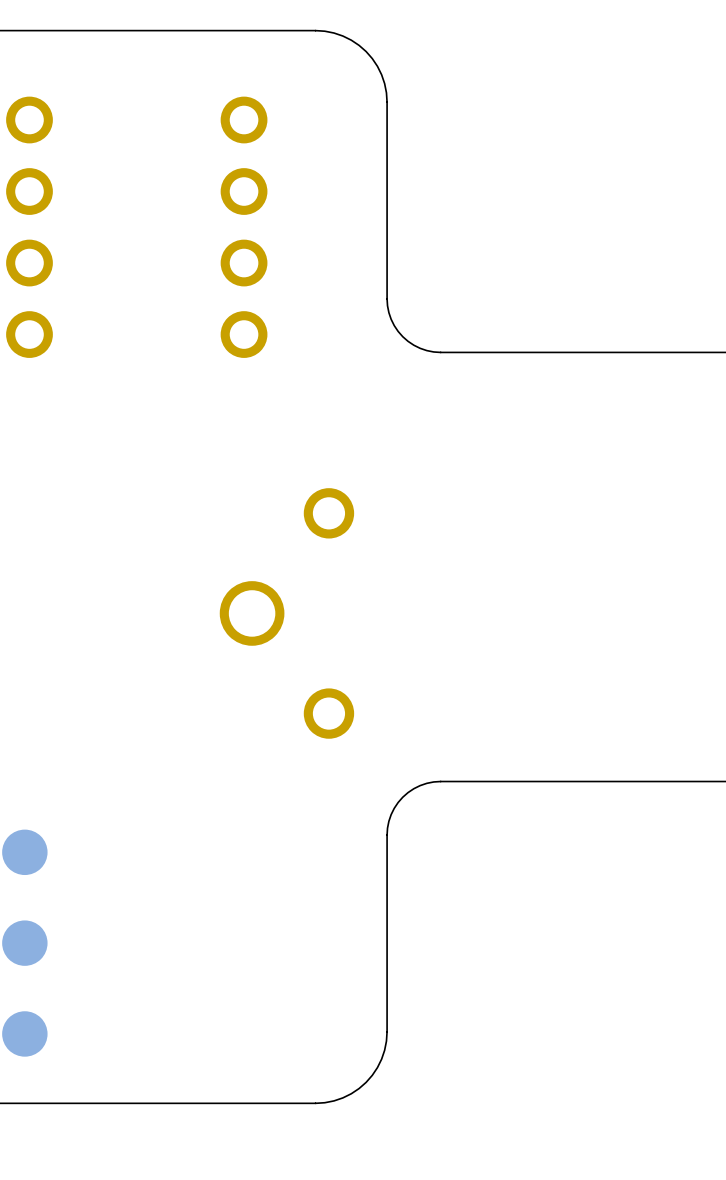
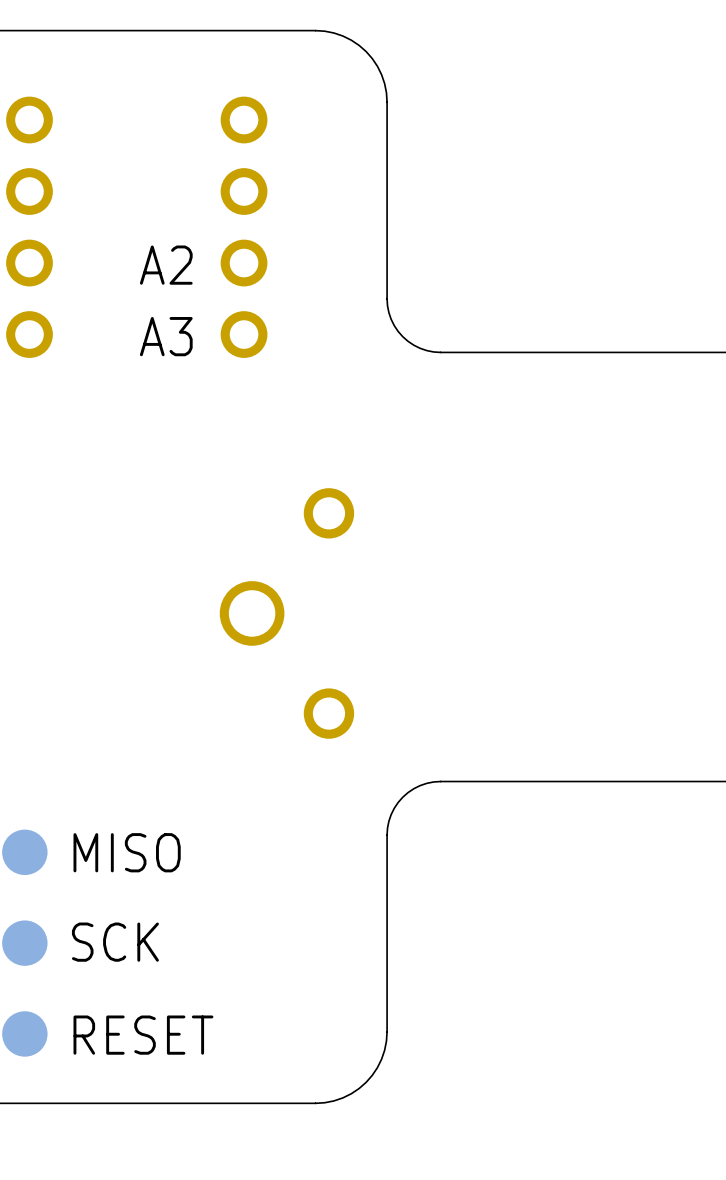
text: none -> A2 (166, 265)
text: none -> A3 (166, 336)
text: none -> MISO (127, 852)
text: none -> SCK (115, 942)
text: none -> RESET (143, 1035)

